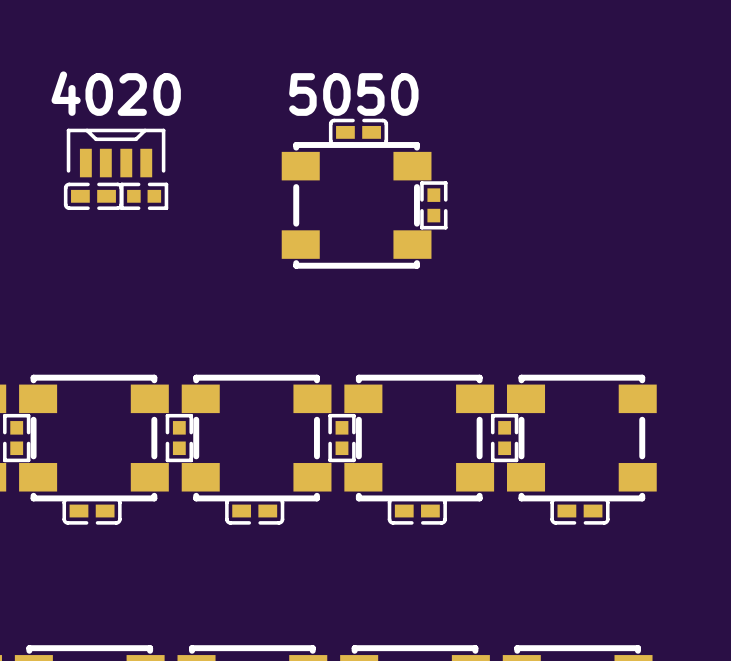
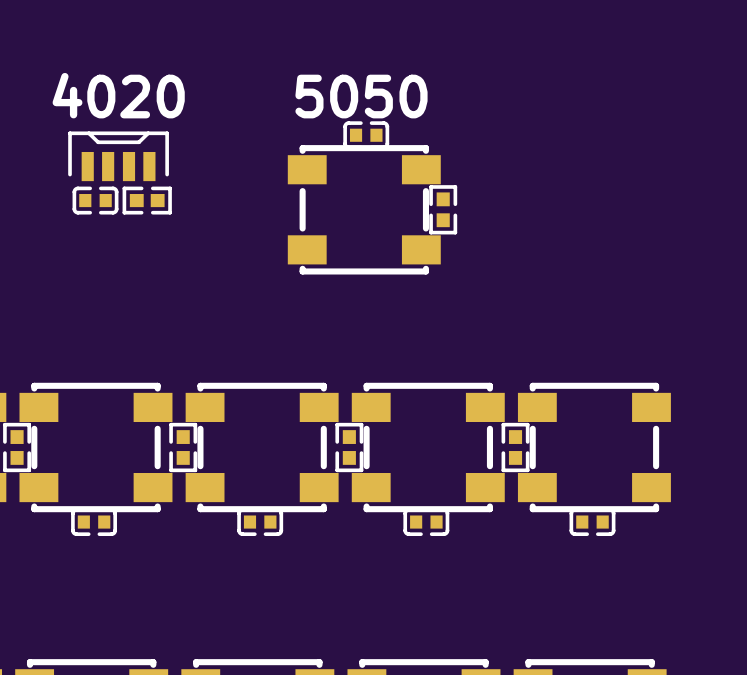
part footprint: [328, 118, 389, 147] -> [343, 121, 390, 150]
part footprint: [63, 182, 124, 210] -> [72, 186, 119, 215]
part footprint: [62, 497, 122, 525] -> [71, 508, 117, 537]
part footprint: [225, 497, 285, 525] -> [237, 508, 284, 537]
part footprint: [387, 497, 447, 525] -> [403, 508, 450, 537]
part footprint: [550, 497, 610, 525] -> [569, 508, 616, 537]

